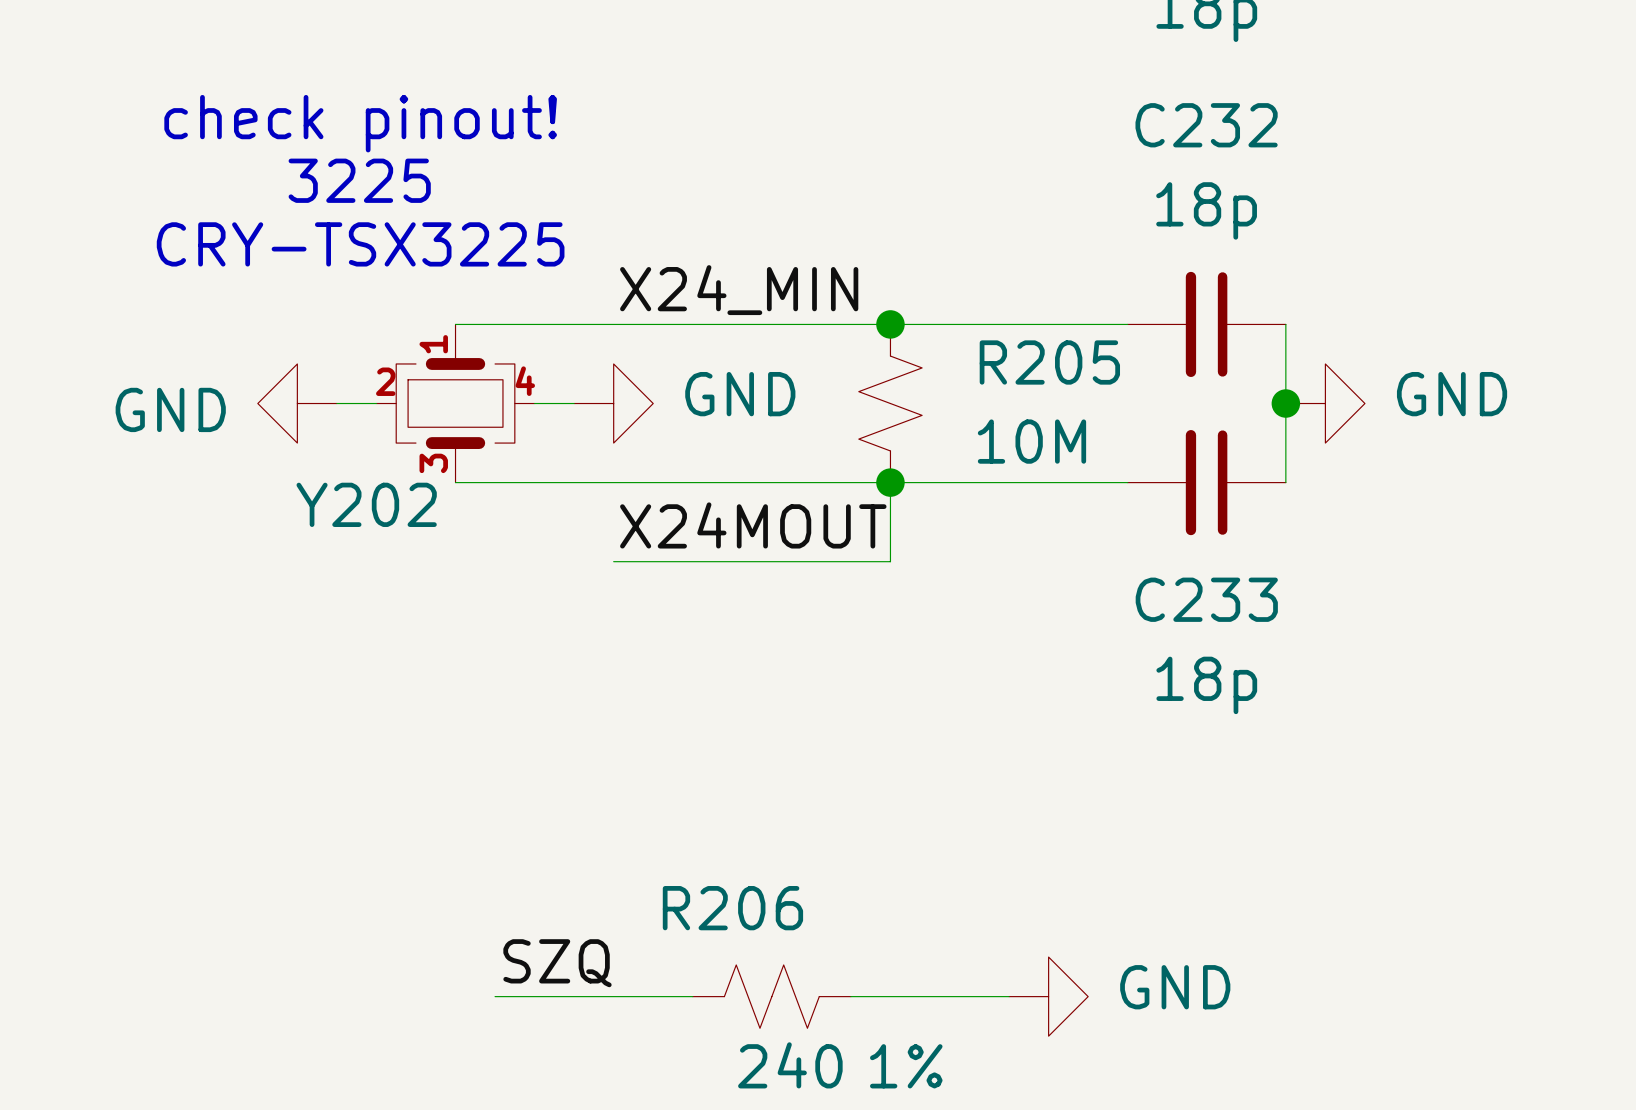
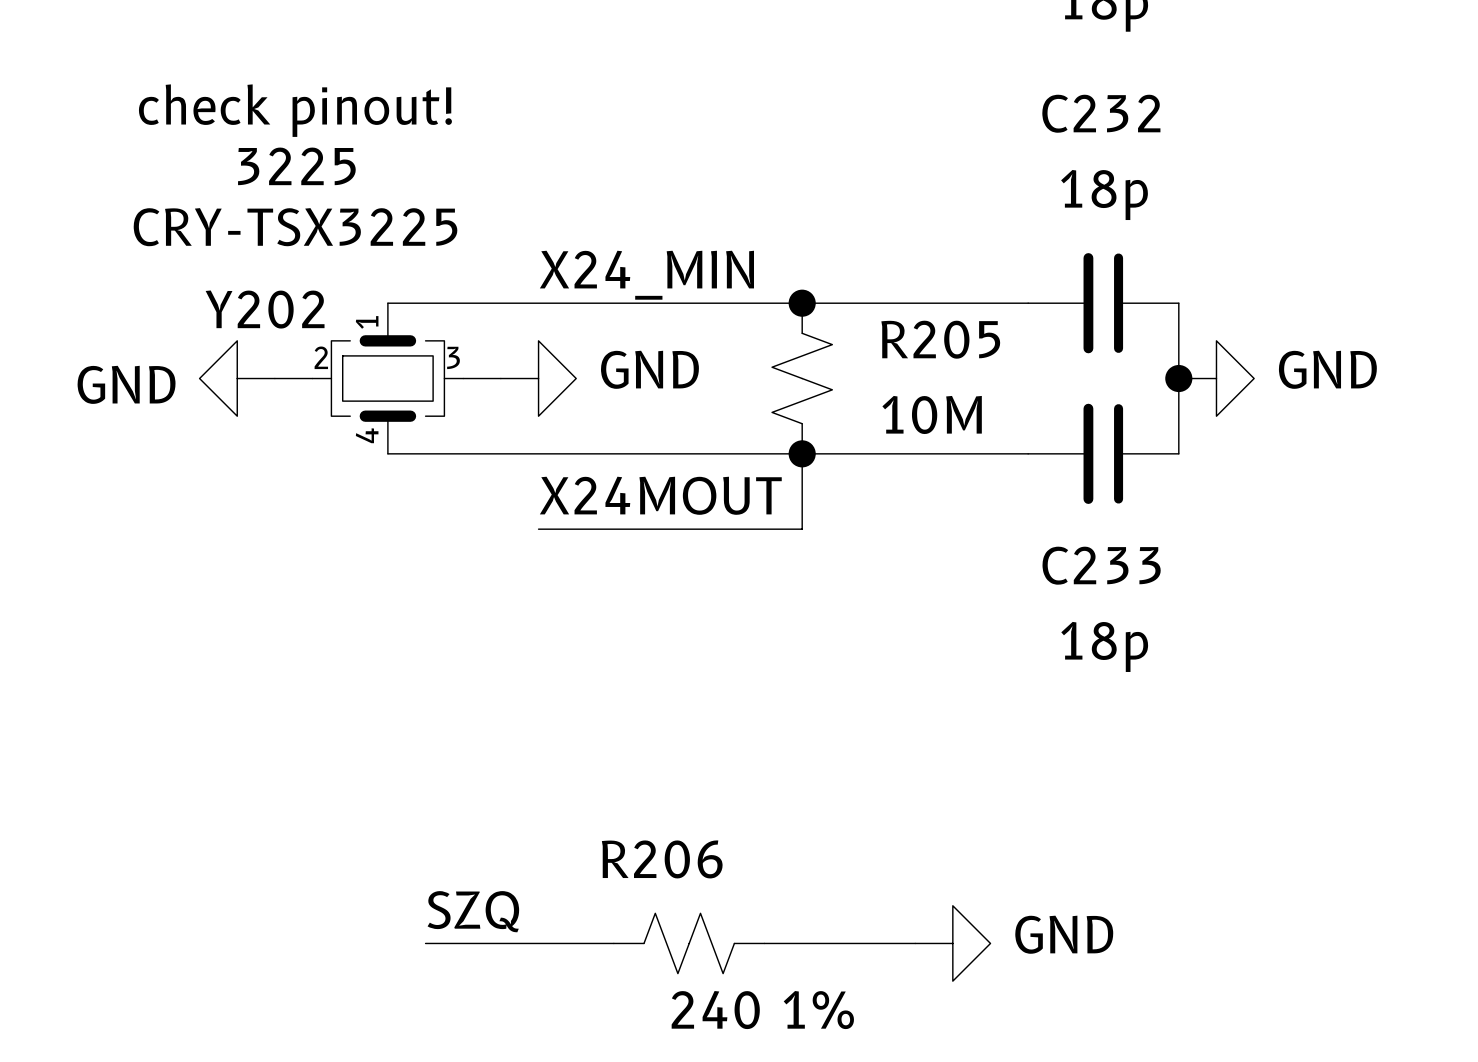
Y202 pin number: 4 (525, 381) -> 3 (453, 357)
Y202 pin number: 3 (433, 463) -> 4 (367, 435)
Y202 name position: Y202 (366, 504) -> Y202 (265, 309)

